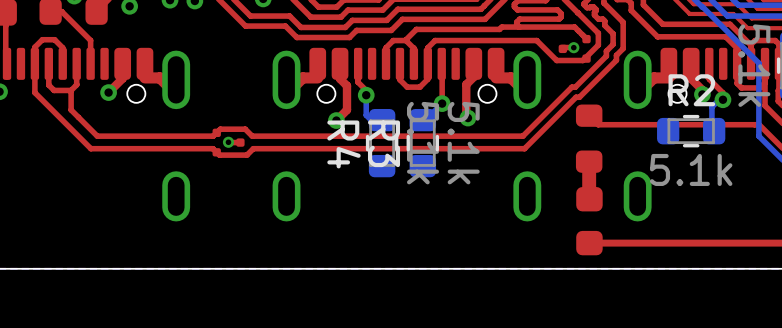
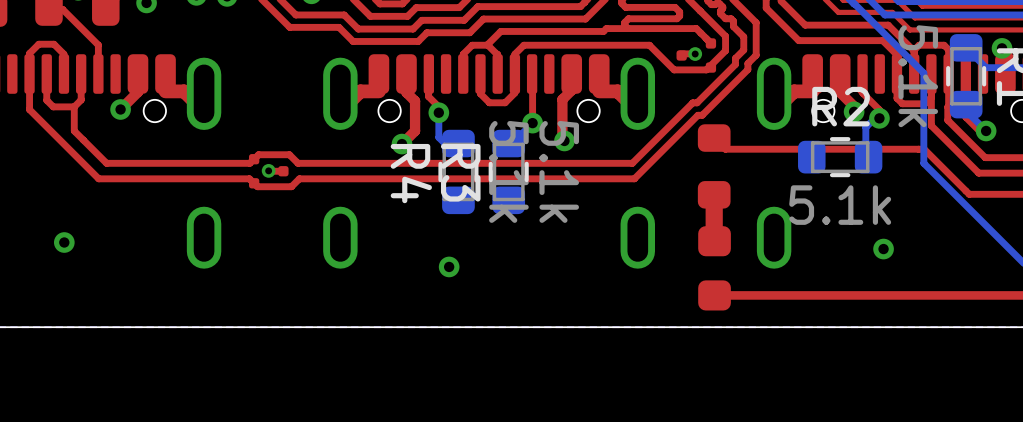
via: none -> (64, 242)
via: none -> (883, 249)
via: none -> (449, 266)

